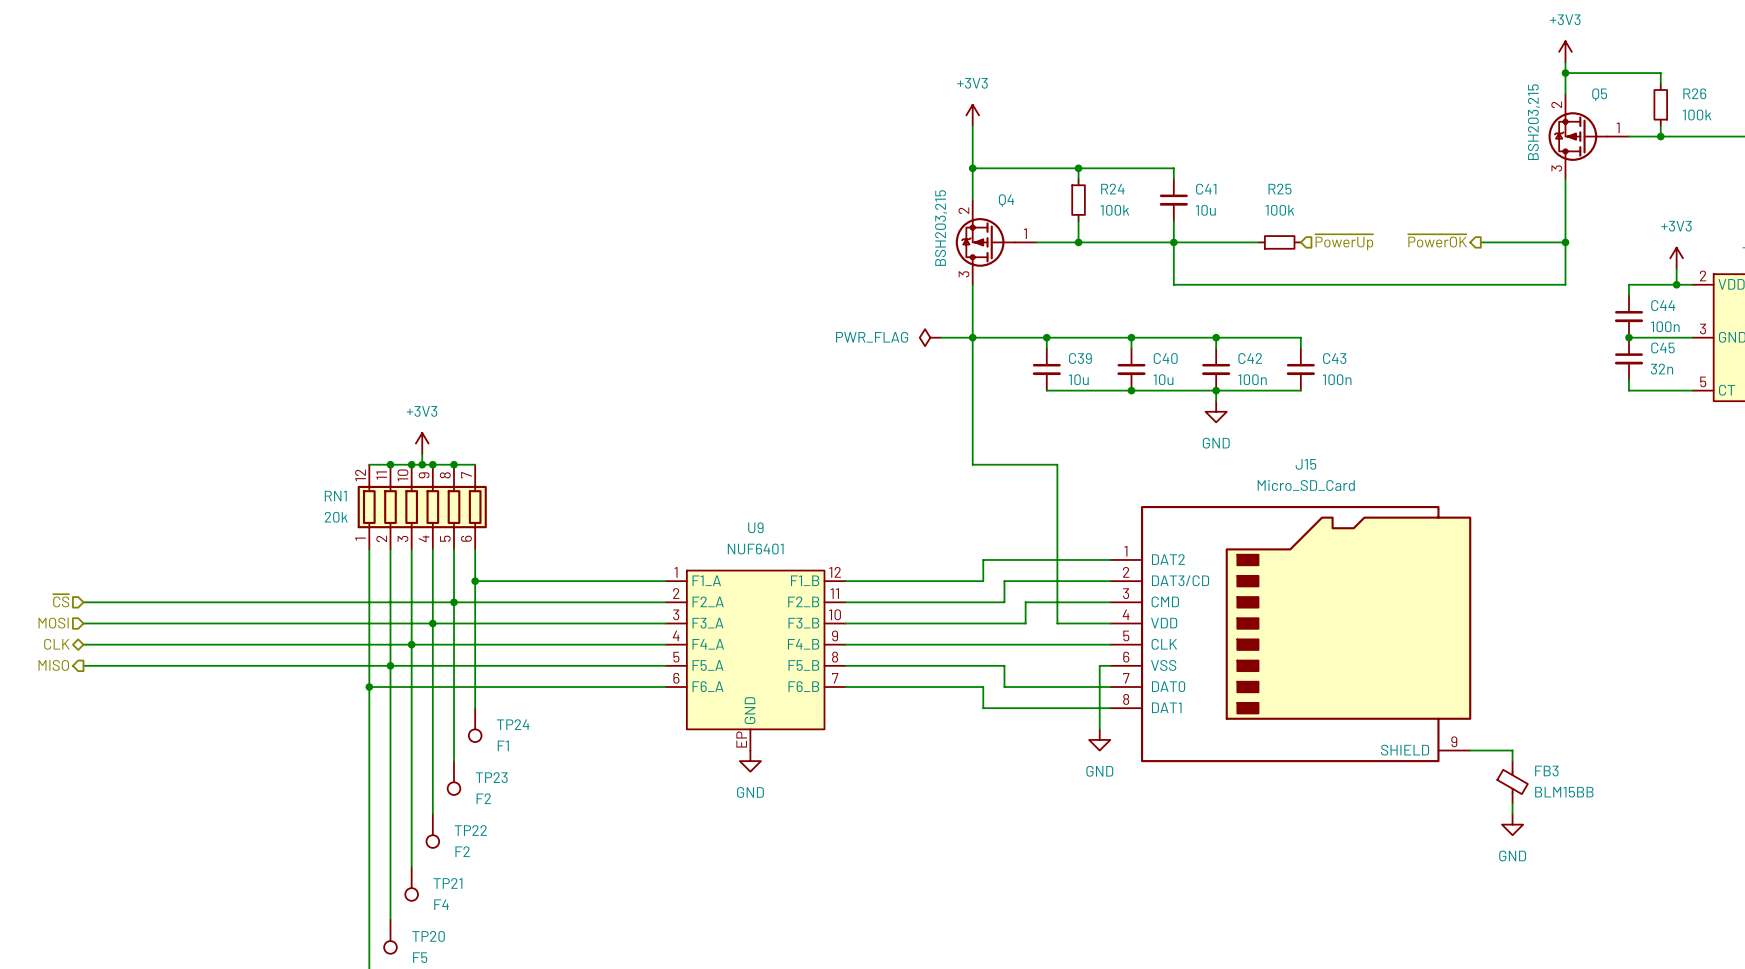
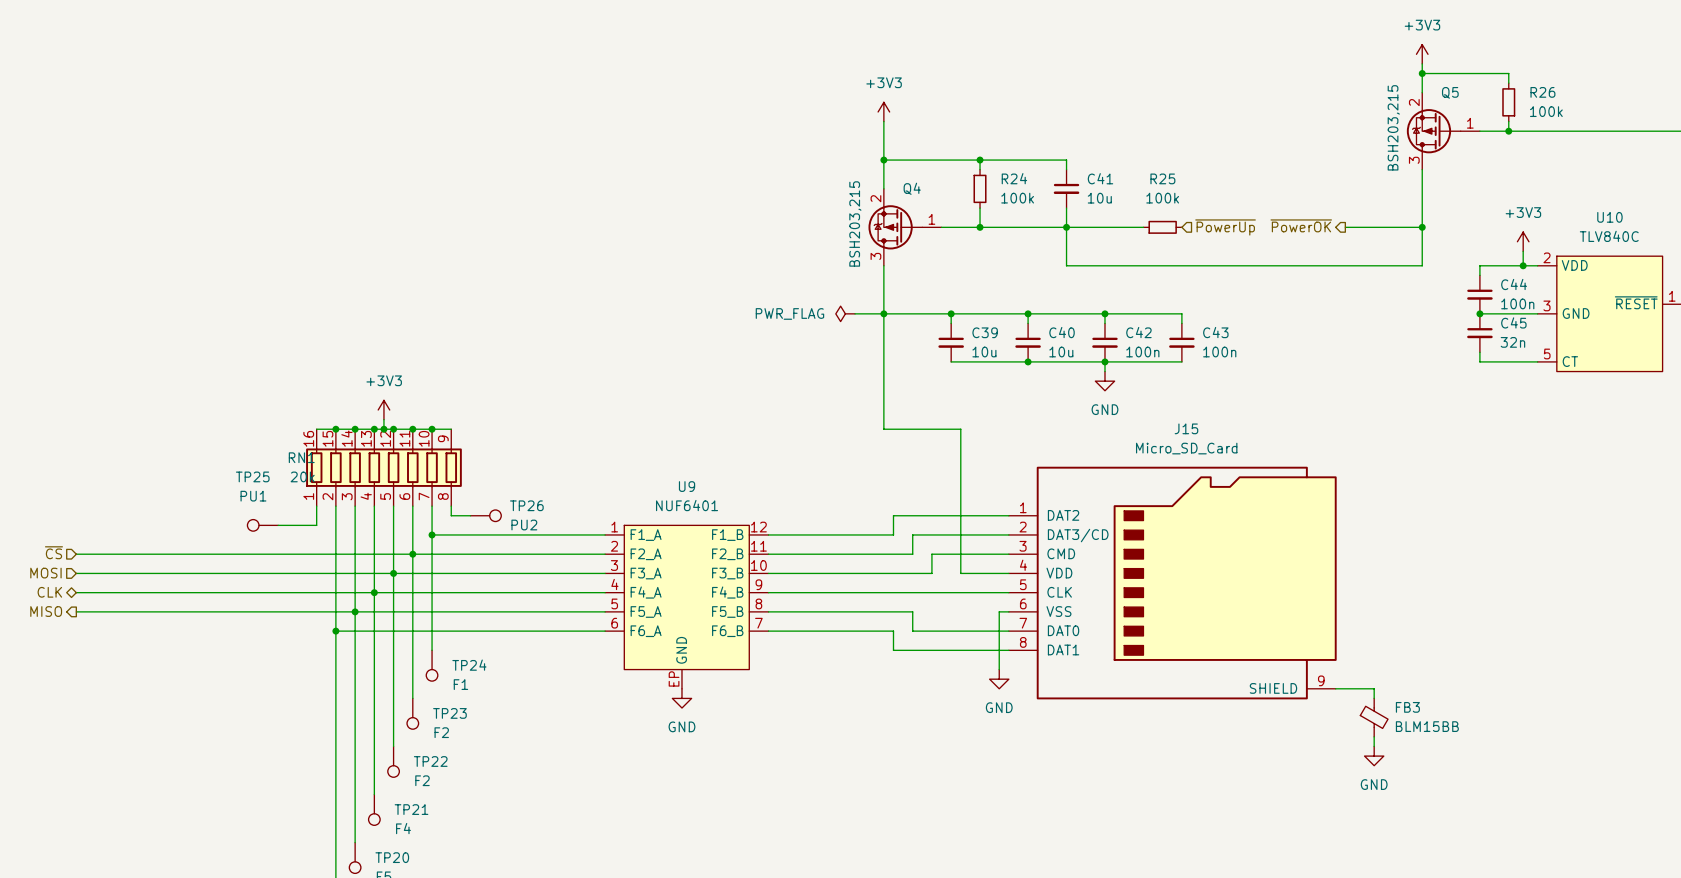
wire: none -> (316, 429) (335, 429)
RN1 symbol: [357, 464, 487, 550] -> [306, 429, 462, 507]
junction: none -> (335, 429)
wire: none -> (432, 429) (451, 429)
junction: none -> (432, 429)
wire: none -> (316, 506) (316, 525) (278, 525)
wire: none -> (451, 506) (451, 515) (470, 515)
TP26: none -> PU2 (485, 515)
TP25: none -> PU1 (262, 525)

